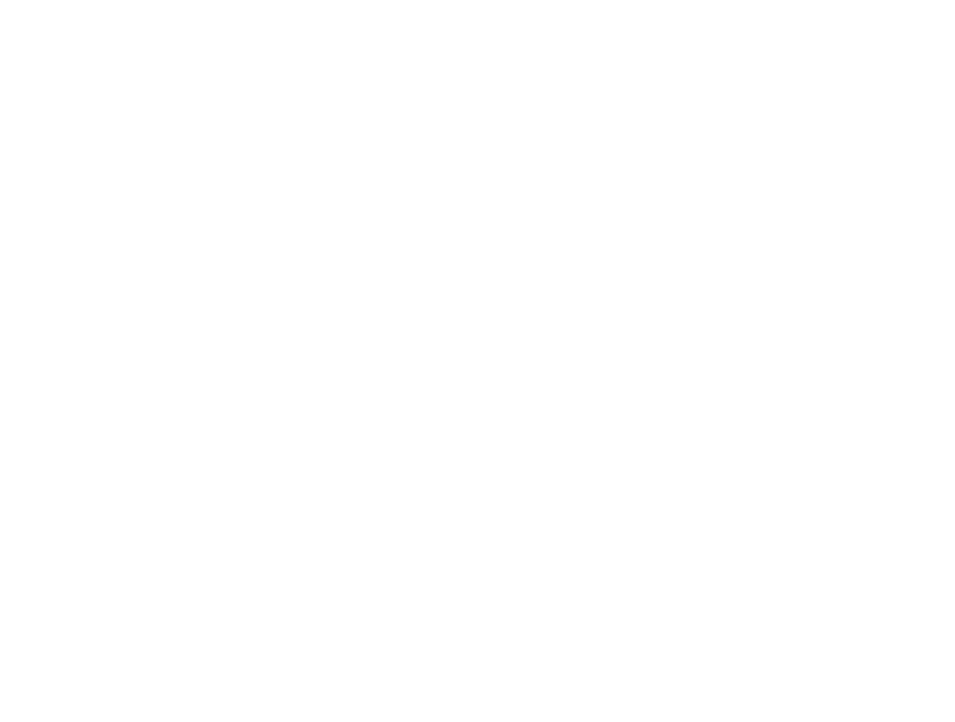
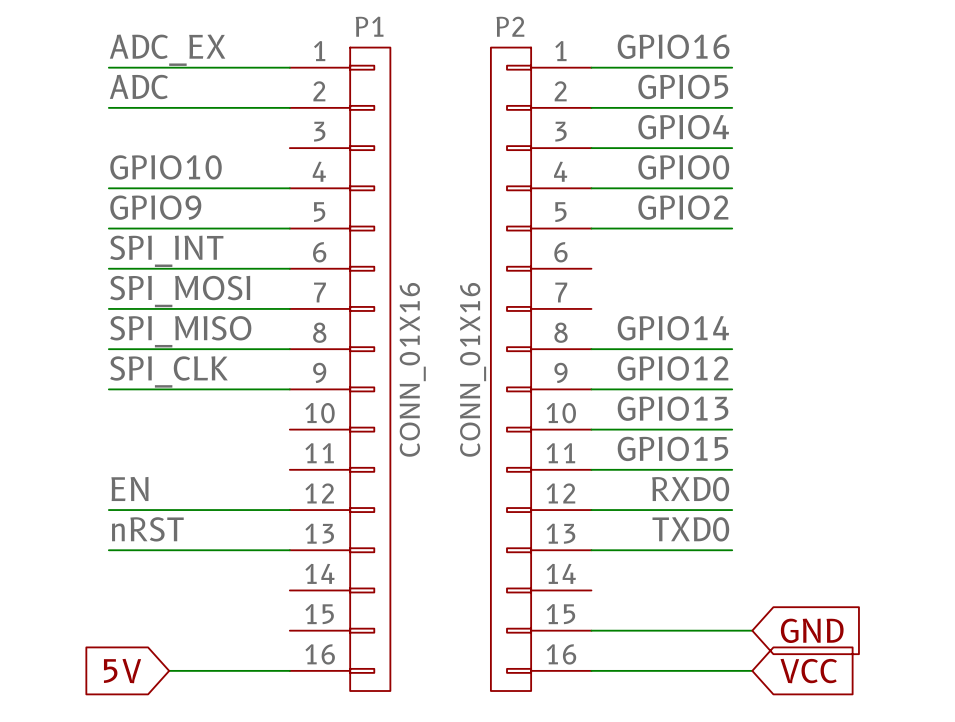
label: none -> GPIO16 (673, 46)
label: none -> ADC_EX (167, 50)
wire: none -> (108, 67) (289, 67)
wire: none -> (591, 67) (732, 67)
label: none -> ADC (138, 86)
label: none -> GPIO5 (683, 86)
wire: none -> (108, 107) (289, 107)
wire: none -> (591, 107) (732, 107)
label: none -> GPIO4 (683, 127)
wire: none -> (591, 148) (732, 148)
label: none -> GPIO10 (166, 167)
label: none -> GPIO0 (683, 167)
wire: none -> (108, 188) (289, 188)
wire: none -> (591, 188) (732, 188)
label: none -> GPIO9 (155, 207)
label: none -> GPIO2 (683, 207)
wire: none -> (108, 228) (289, 228)
wire: none -> (591, 228) (732, 228)
label: none -> SPI_INT (166, 251)
wire: none -> (108, 268) (289, 268)
label: none -> SPI_MOSI (180, 291)
wire: none -> (108, 308) (289, 308)
label: none -> GPIO14 (673, 328)
label: none -> SPI_MISO (180, 331)
wire: none -> (108, 349) (289, 349)
wire: none -> (591, 349) (732, 349)
label: none -> GPIO12 (673, 368)
label: none -> SPI_CLK (168, 371)
P1: none -> CONN_01X16 (340, 369)
P2: none -> CONN_01X16 (541, 369)
wire: none -> (108, 389) (289, 389)
wire: none -> (591, 389) (732, 389)
label: none -> GPIO13 (673, 408)
wire: none -> (591, 429) (732, 429)
label: none -> GPIO15 (672, 448)
wire: none -> (591, 469) (732, 469)
label: none -> EN (129, 488)
label: none -> RXD0 (690, 489)
wire: none -> (108, 510) (289, 510)
wire: none -> (591, 510) (732, 510)
label: none -> nRST (147, 529)
label: none -> TXD0 (690, 529)
wire: none -> (108, 550) (289, 550)
wire: none -> (591, 550) (732, 550)
wire: none -> (591, 630) (752, 630)
global label: none -> GND (812, 630)
global label: none -> 5V (122, 671)
wire: none -> (169, 670) (289, 670)
wire: none -> (591, 670) (752, 670)
global label: none -> VCC (808, 671)

